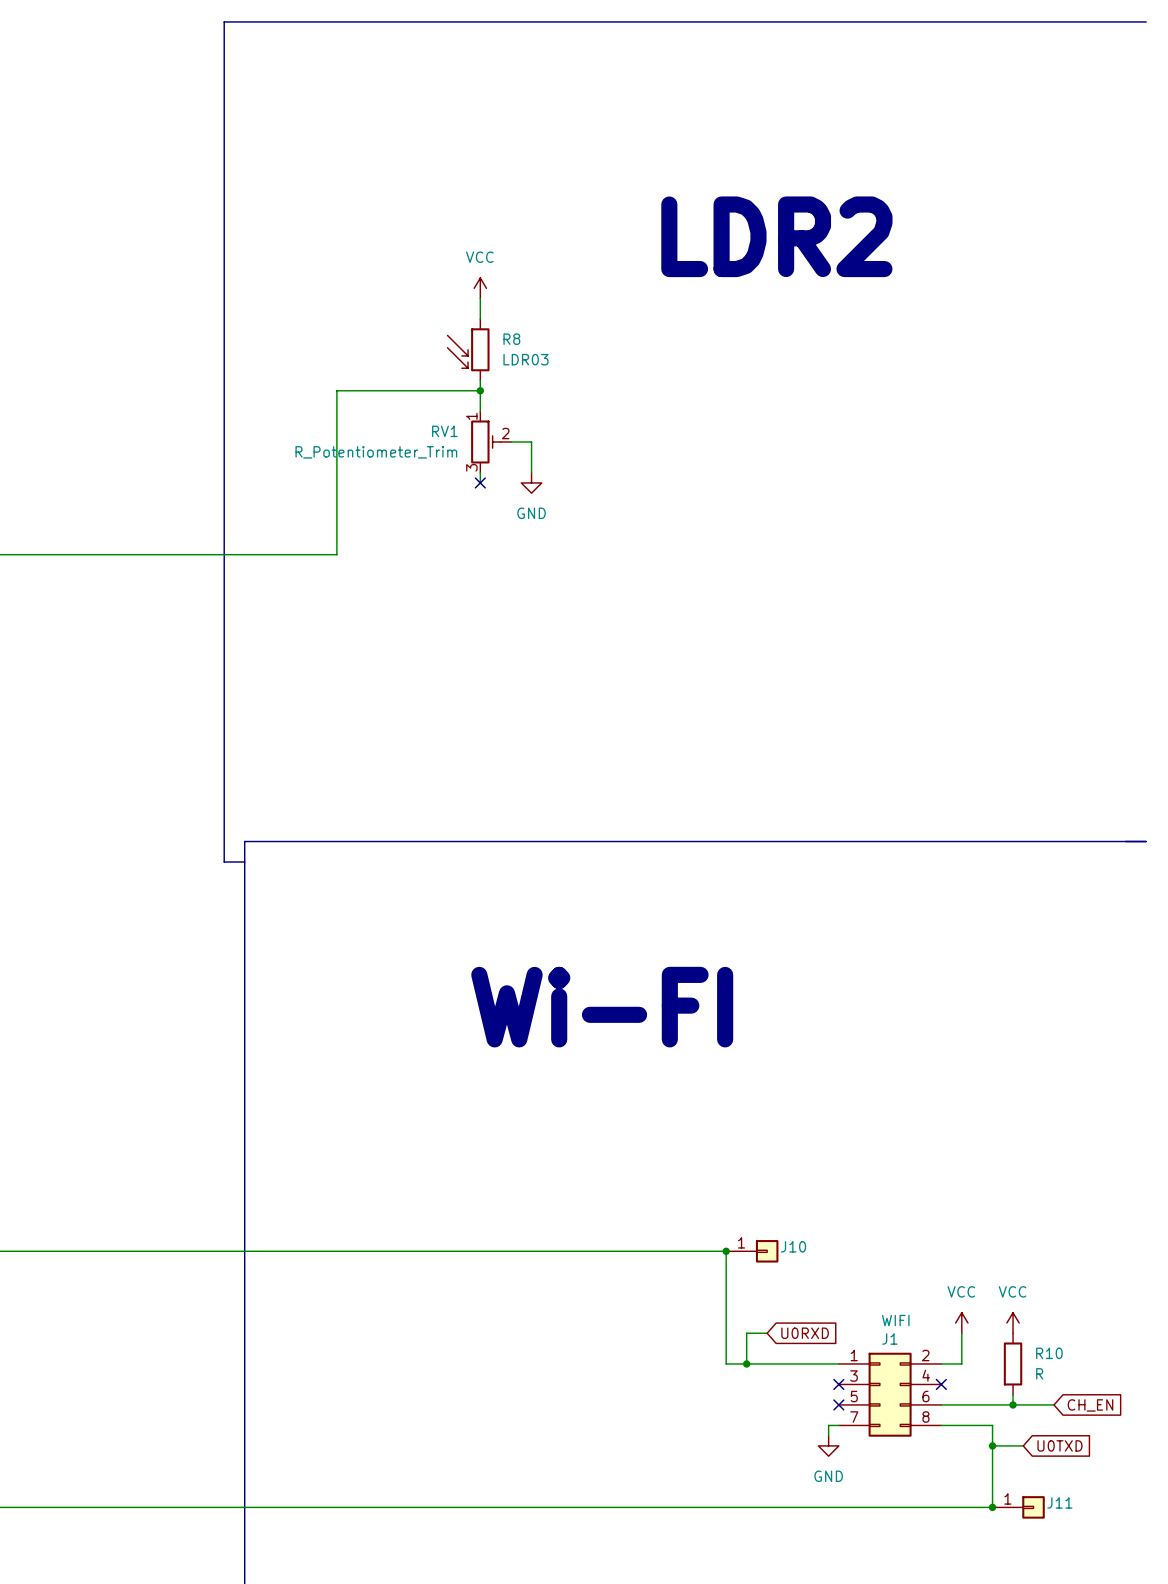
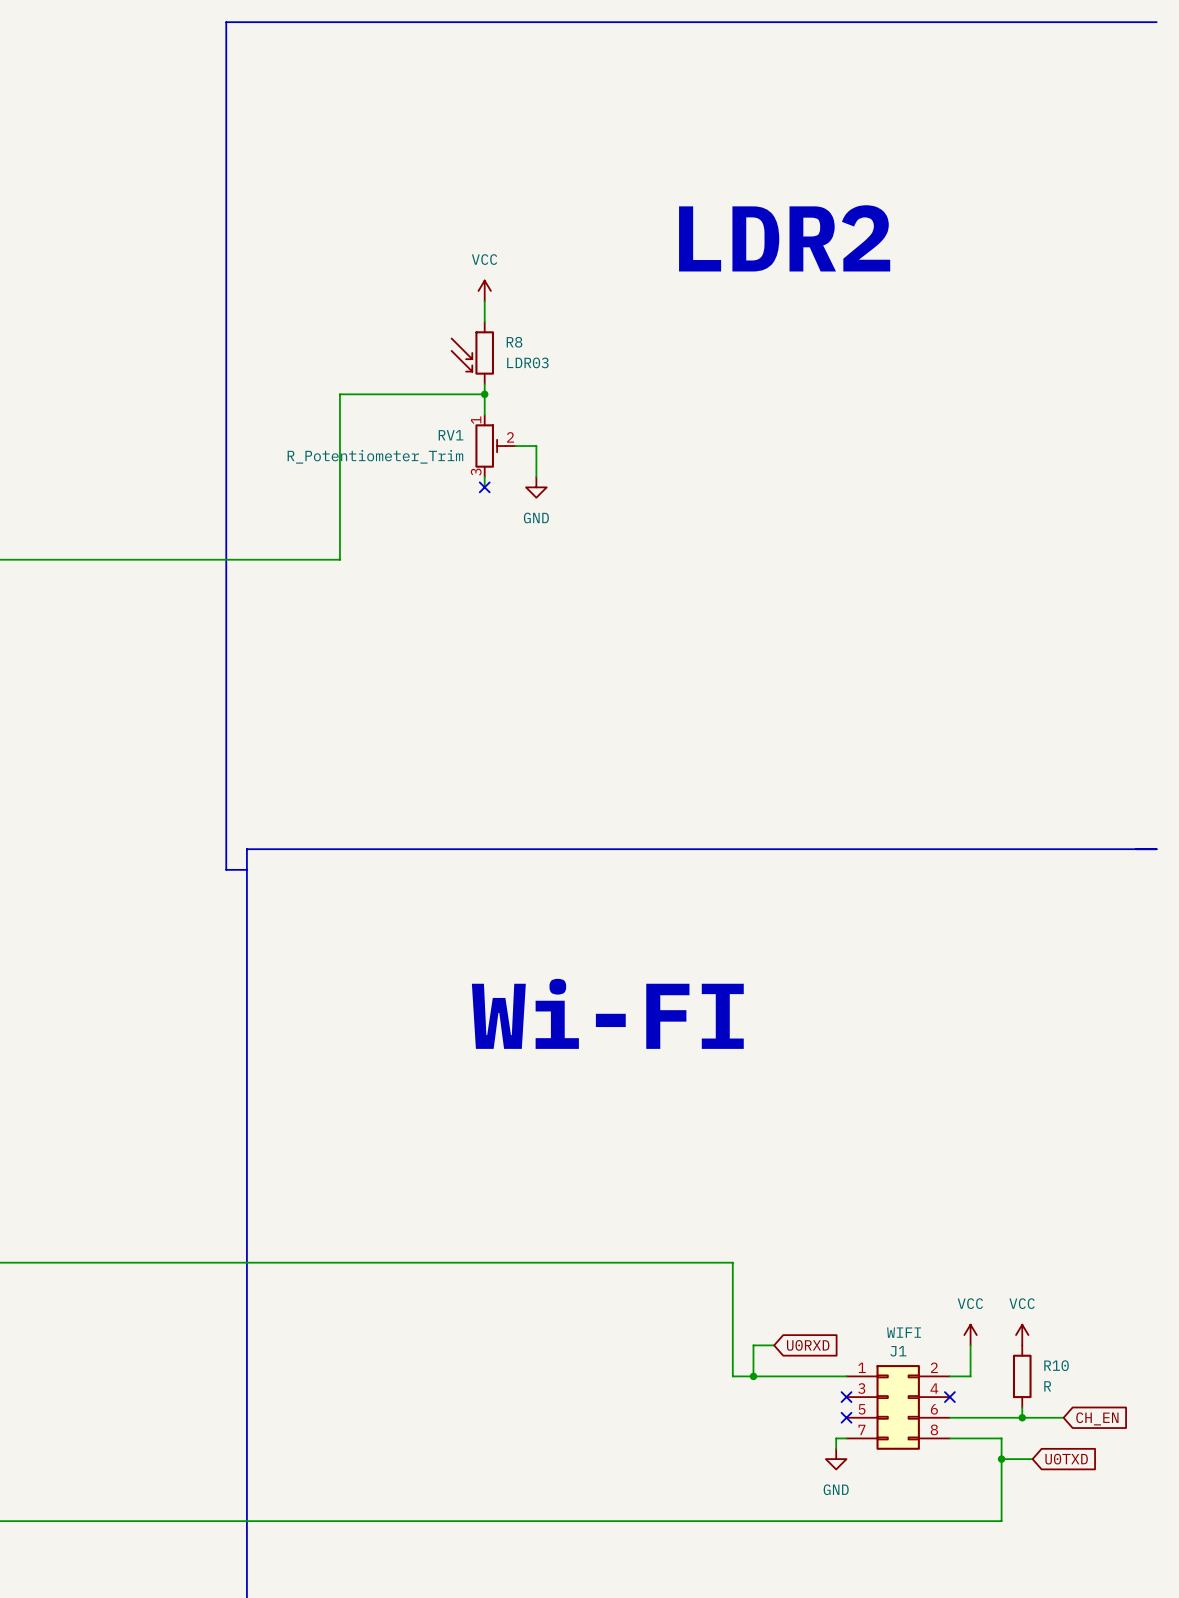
junction: (726, 1251) -> none
J10: (752, 1251) -> none
junction: (992, 1507) -> none
J11: (1018, 1507) -> none

